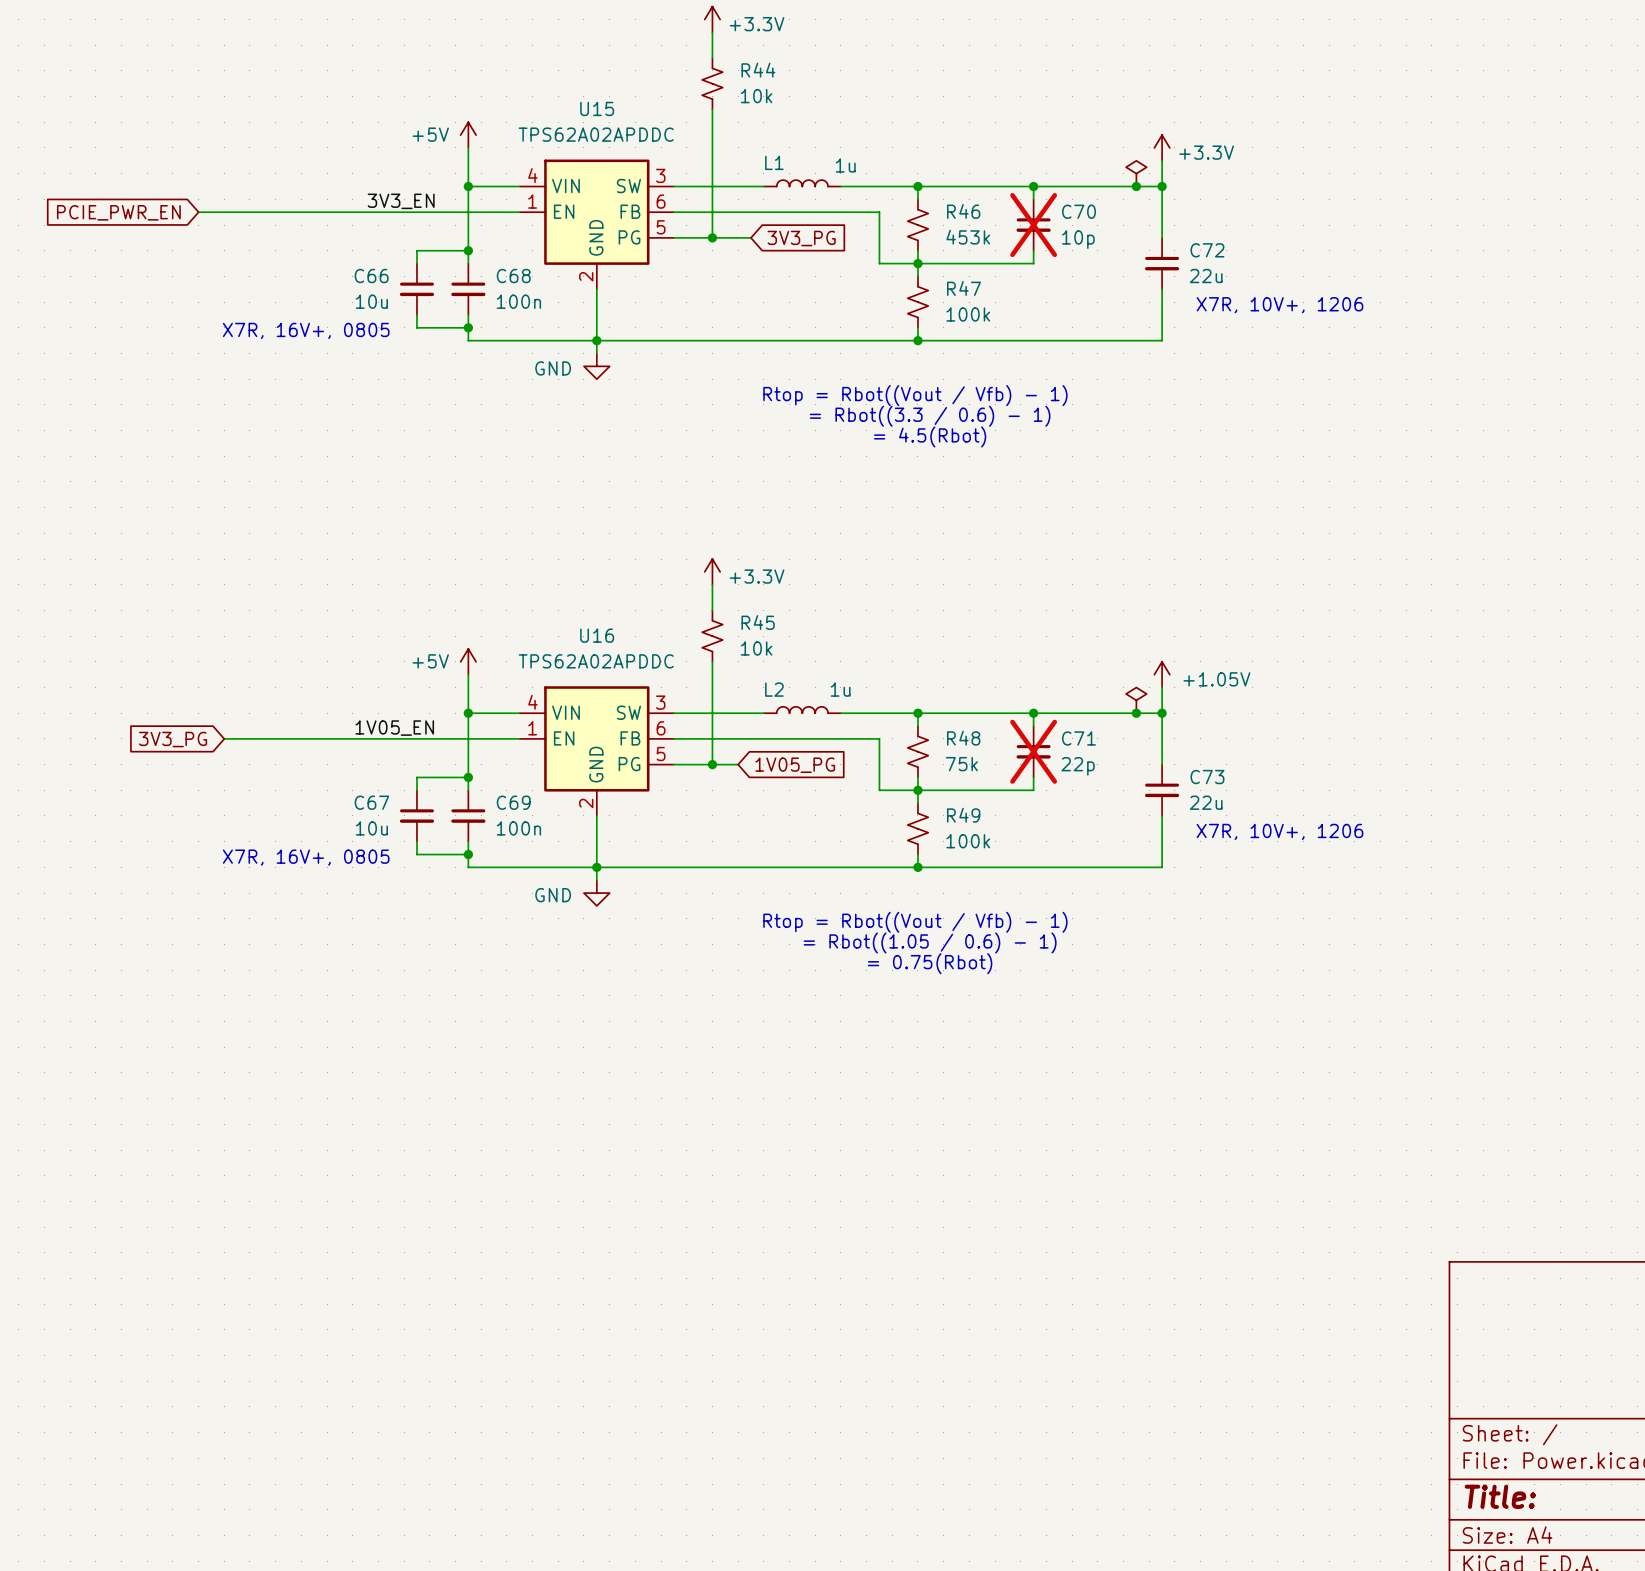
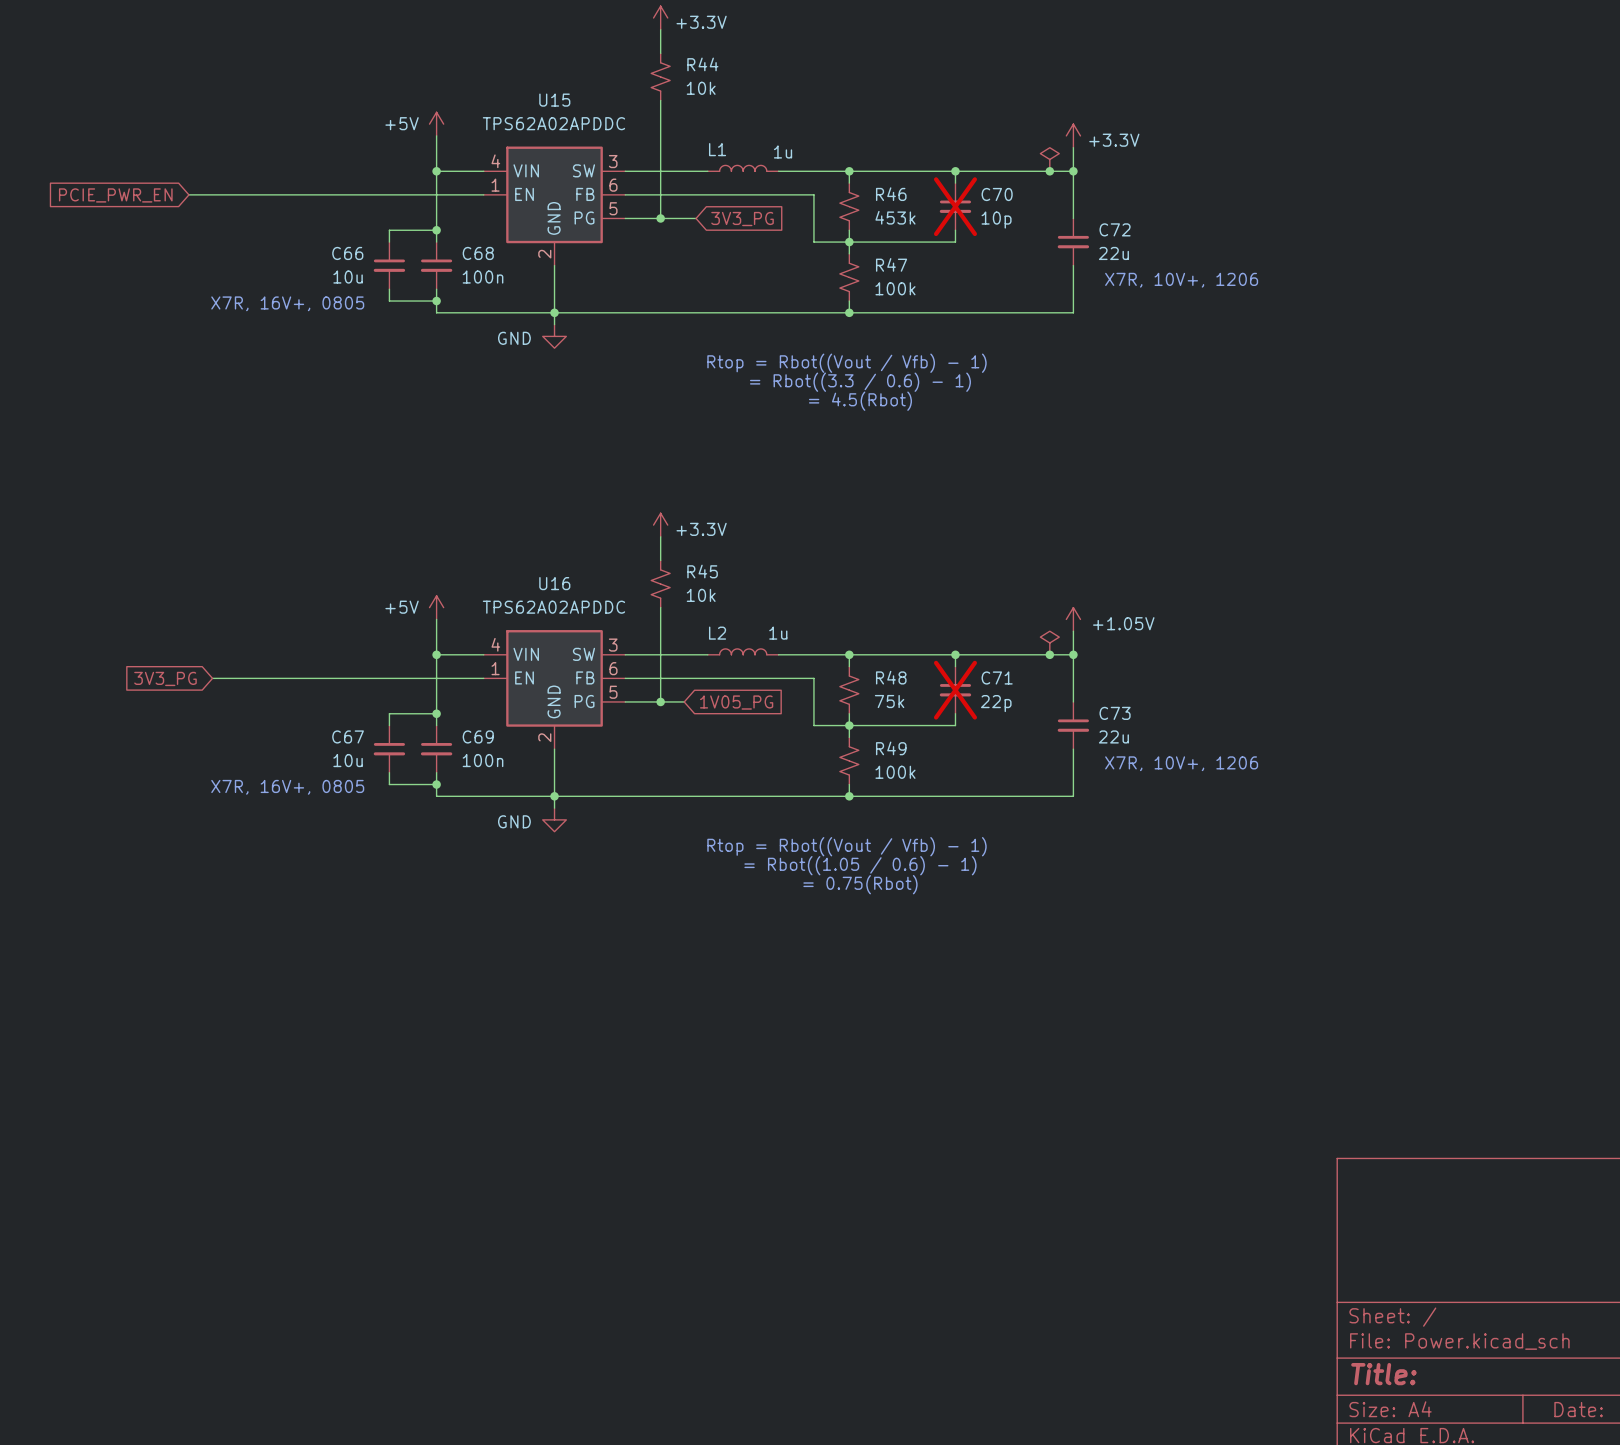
label: 3V3_EN (401, 201) -> none
label: 1V05_EN (394, 728) -> none

